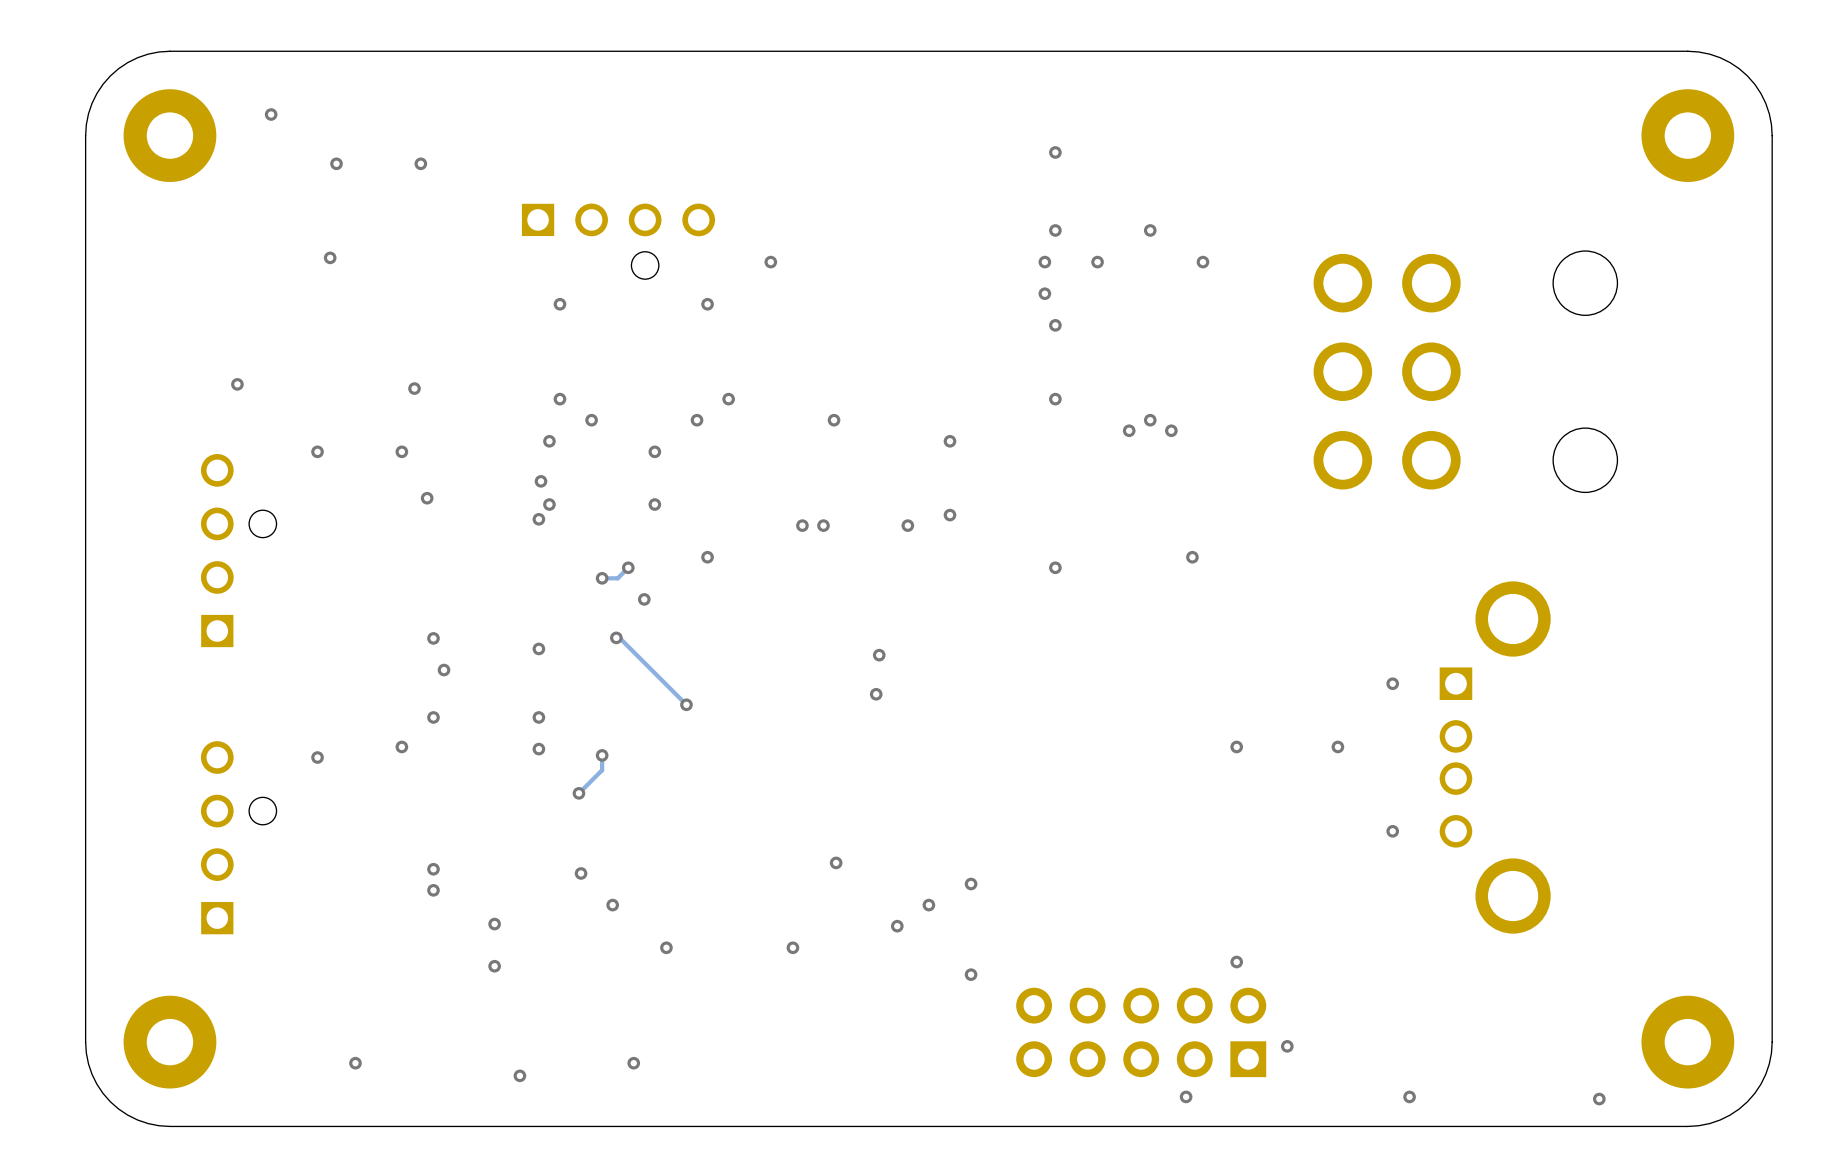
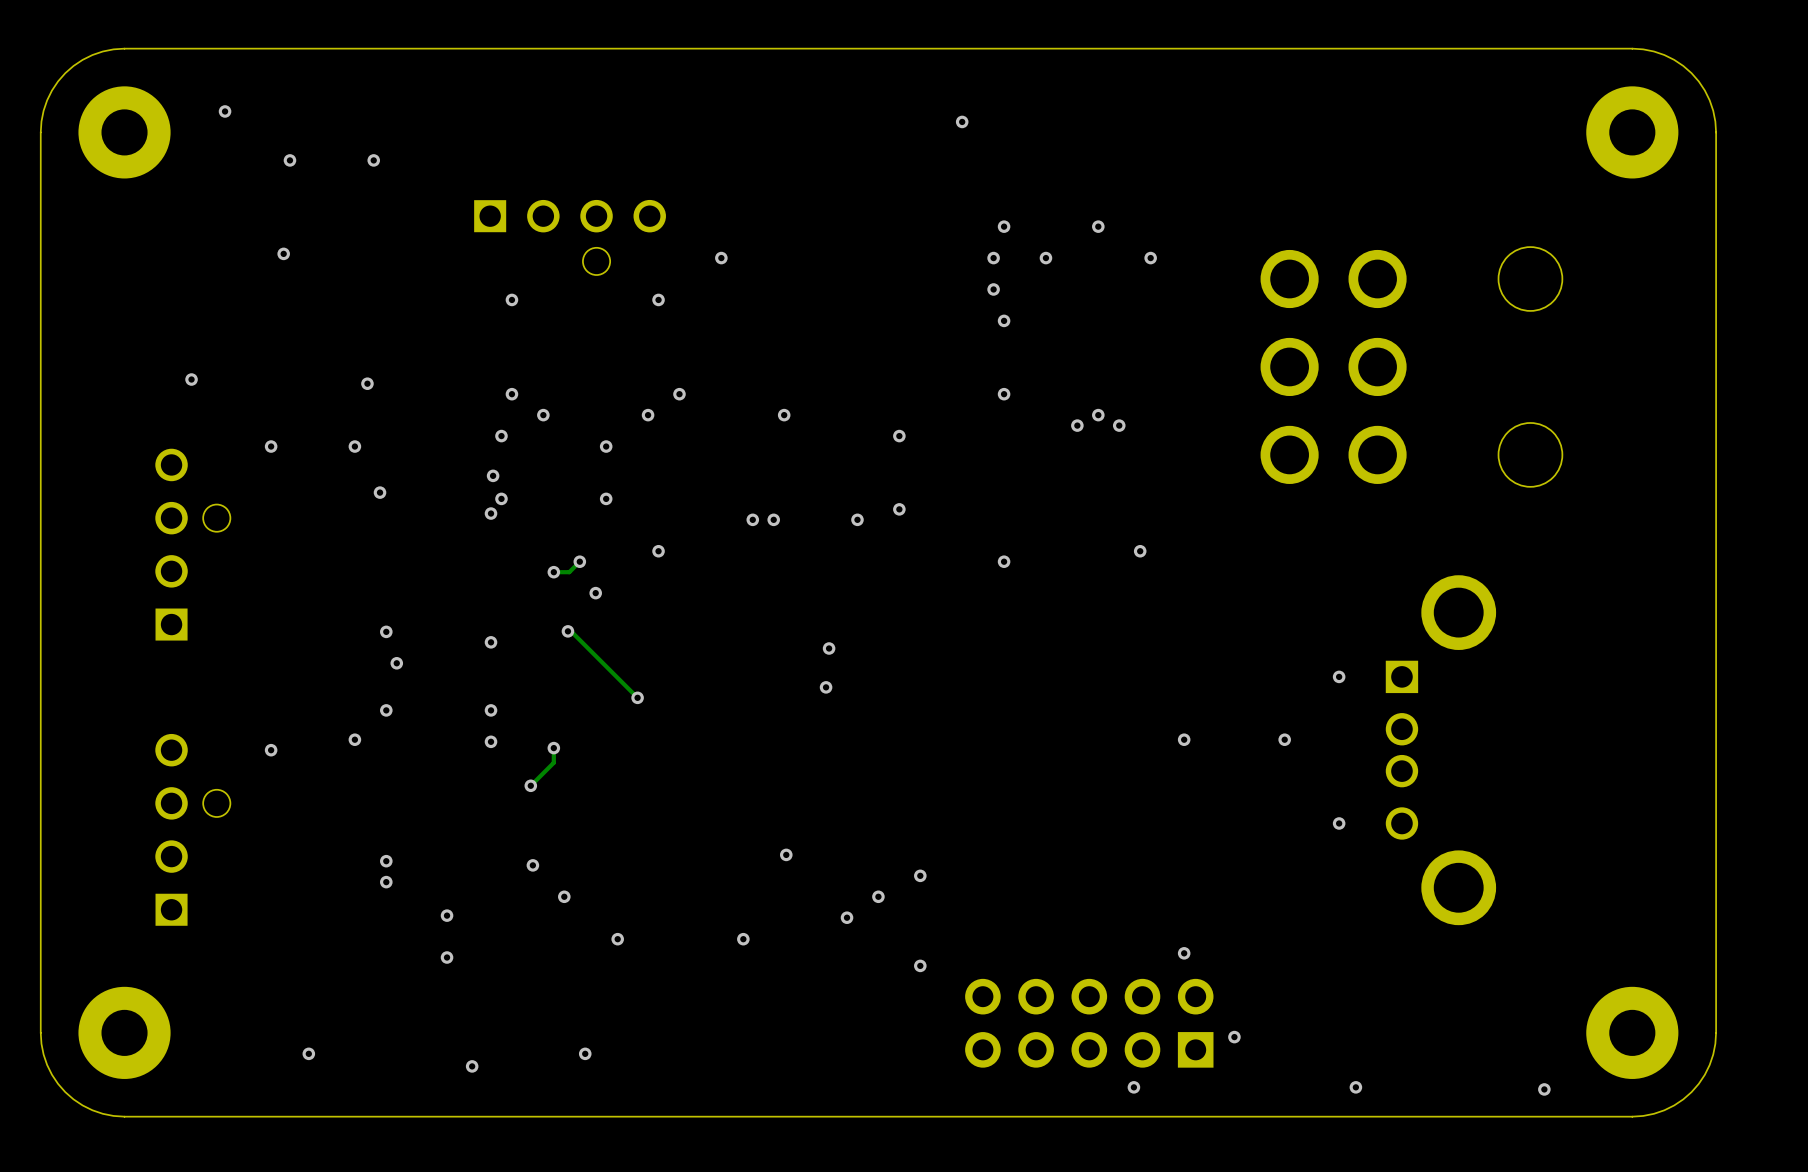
via position: (1055, 152) -> (962, 121)

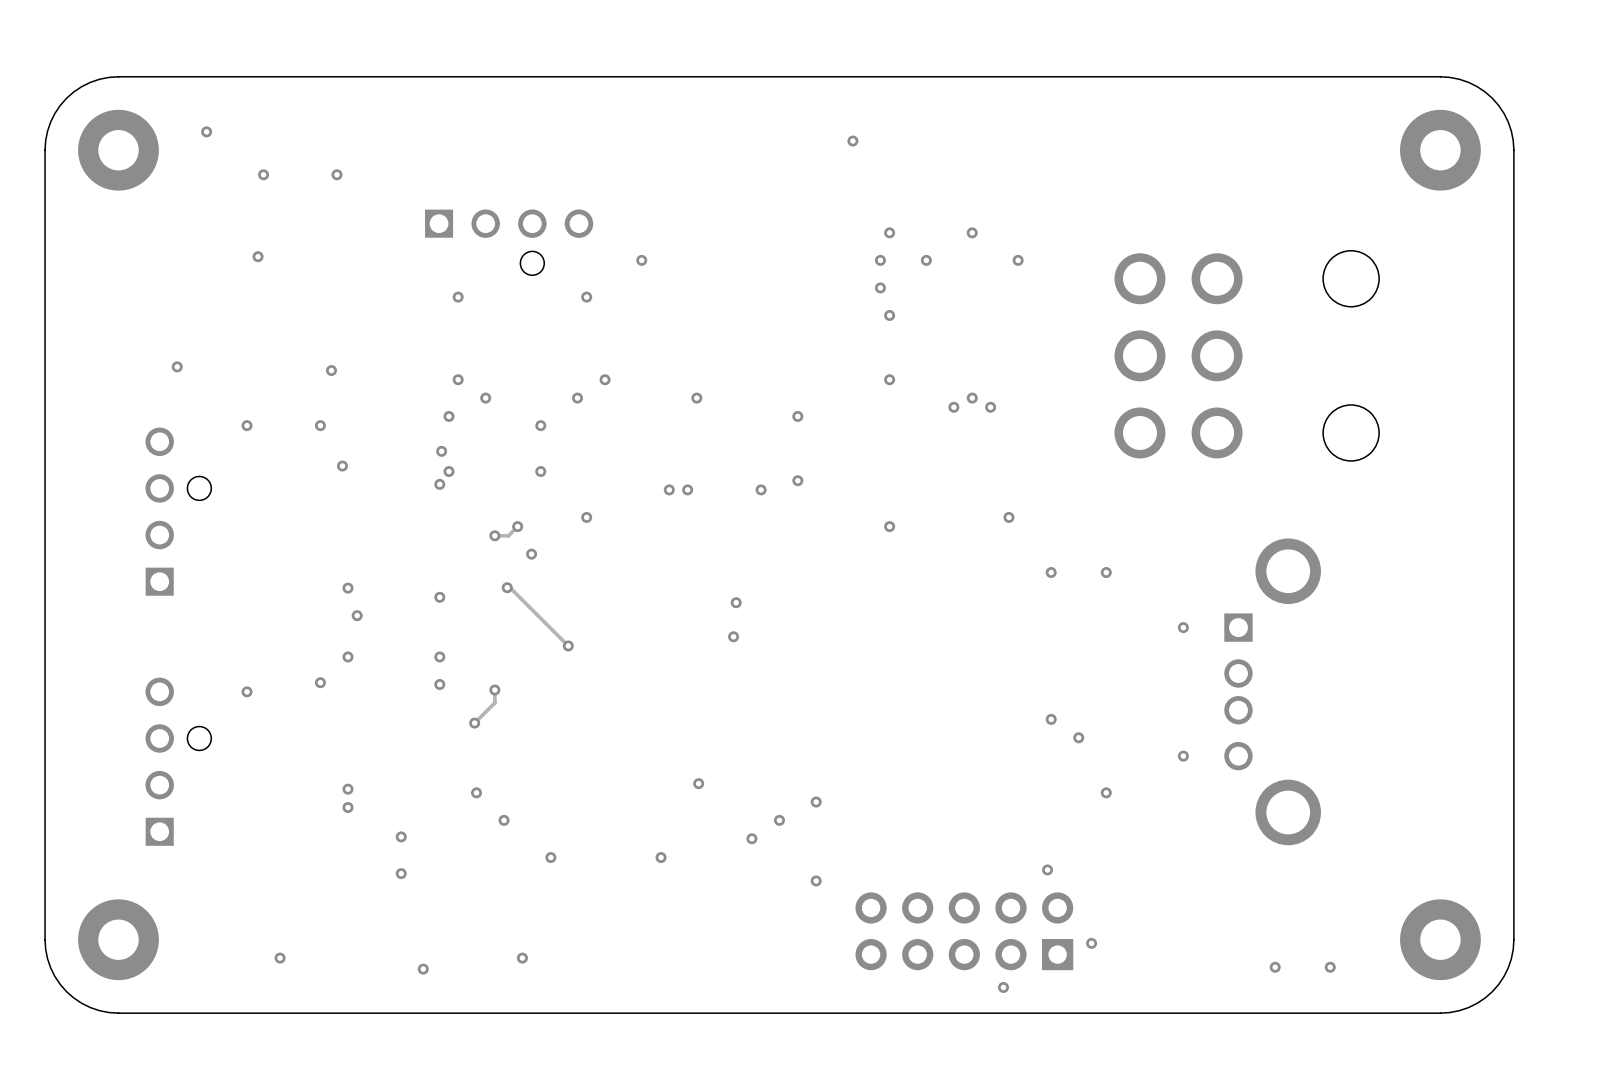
via: none -> (1051, 572)
via: none -> (1106, 572)
via: (1184, 739) -> none
via: (1284, 739) -> none
via: none -> (1051, 719)
via: none -> (1078, 737)
via: none -> (1106, 792)
via: none -> (1275, 967)
via: (1355, 1087) -> none
via position: (1544, 1089) -> (1330, 967)

